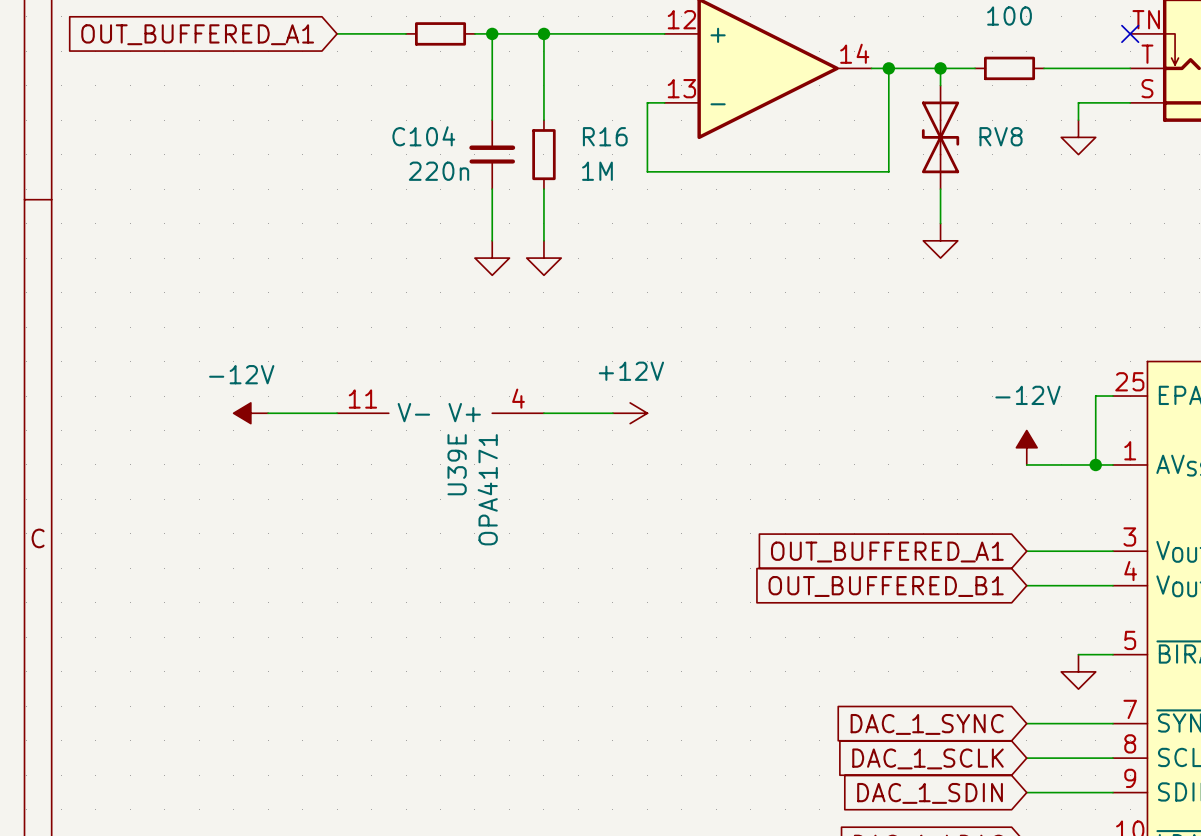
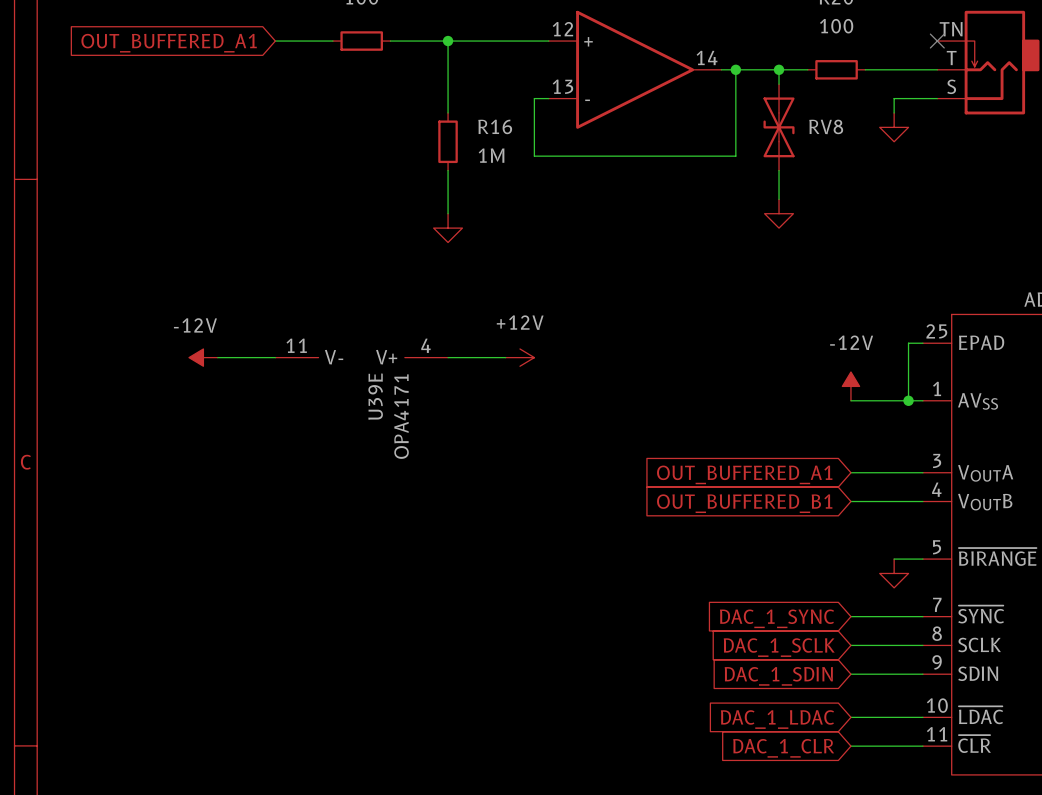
wire: (492, 33) (492, 120) -> none
junction: (492, 33) -> none
C104: 220n (492, 154) -> none
wire: (492, 189) (492, 240) -> none
power symbol: (492, 258) -> none

